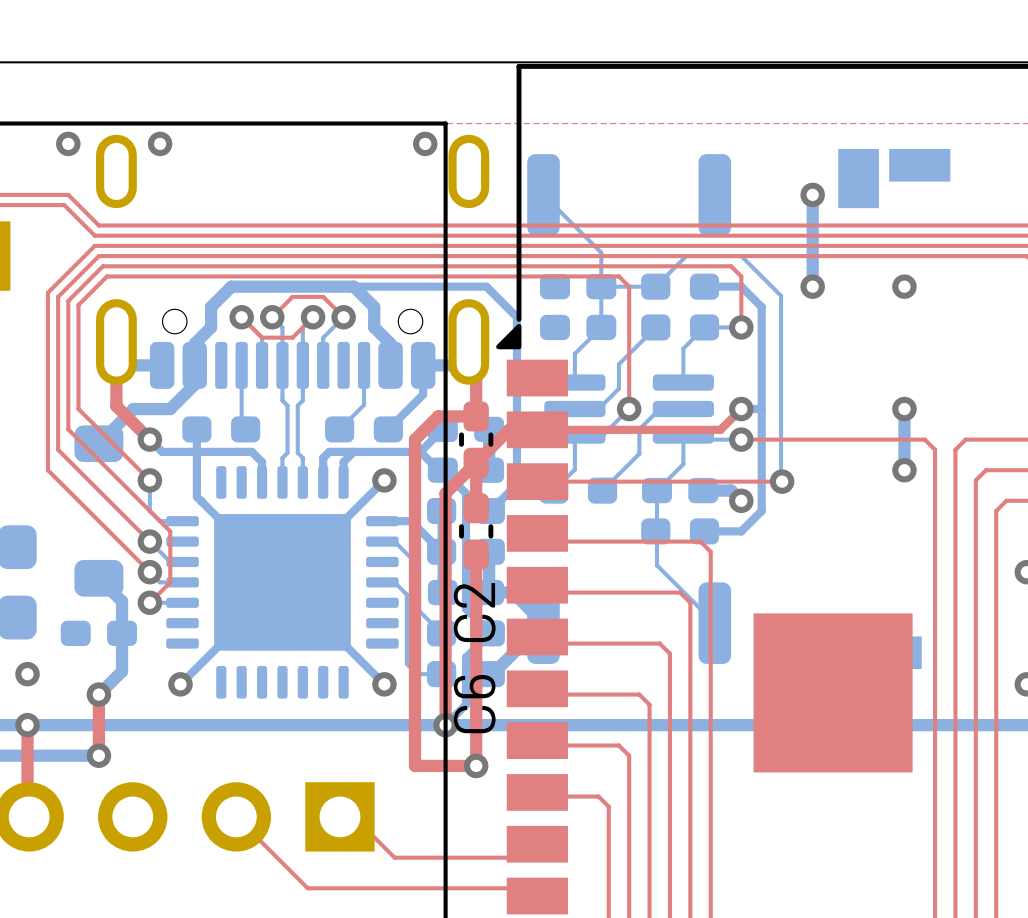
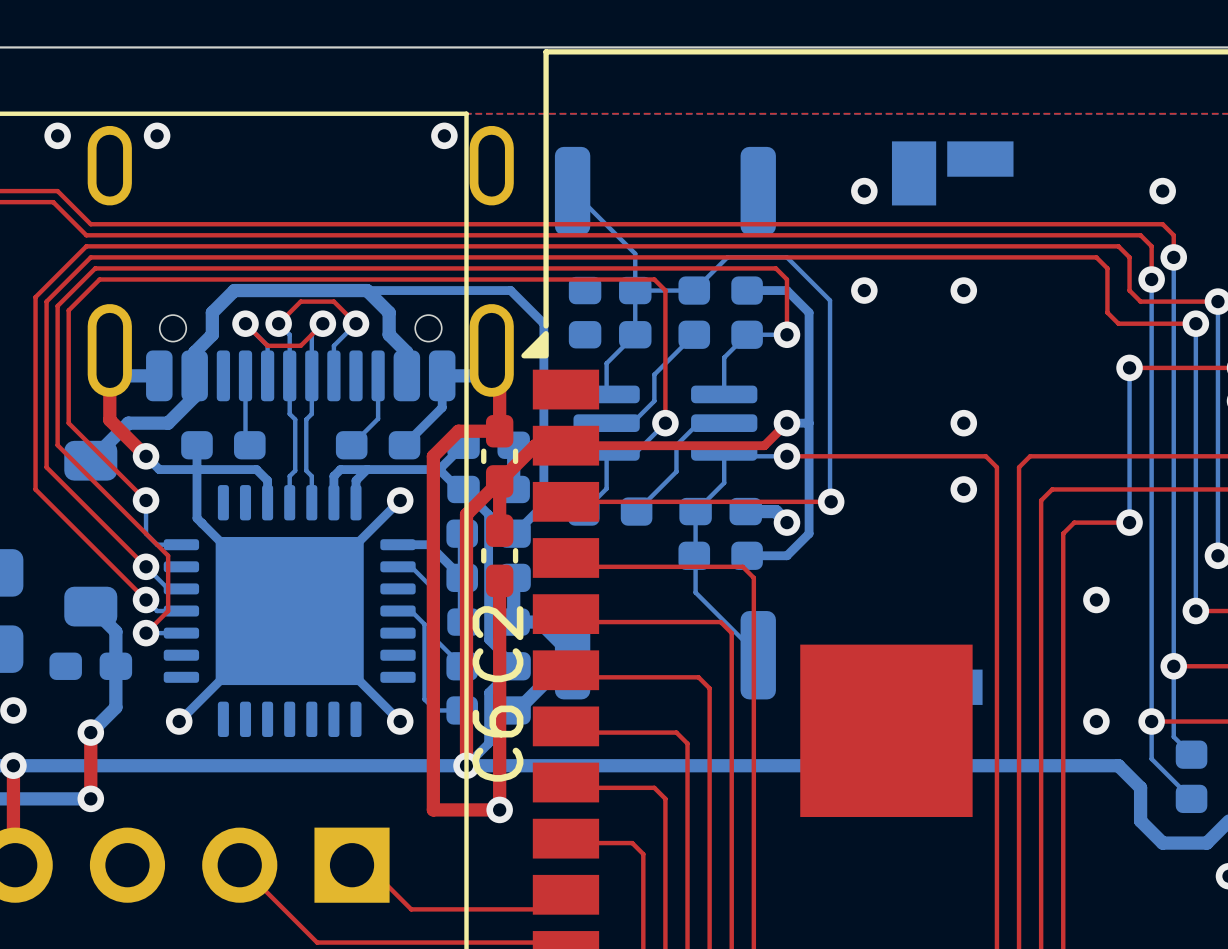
bottom track: (812, 194) (812, 286) -> none
bottom track: (904, 409) (904, 470) -> none

